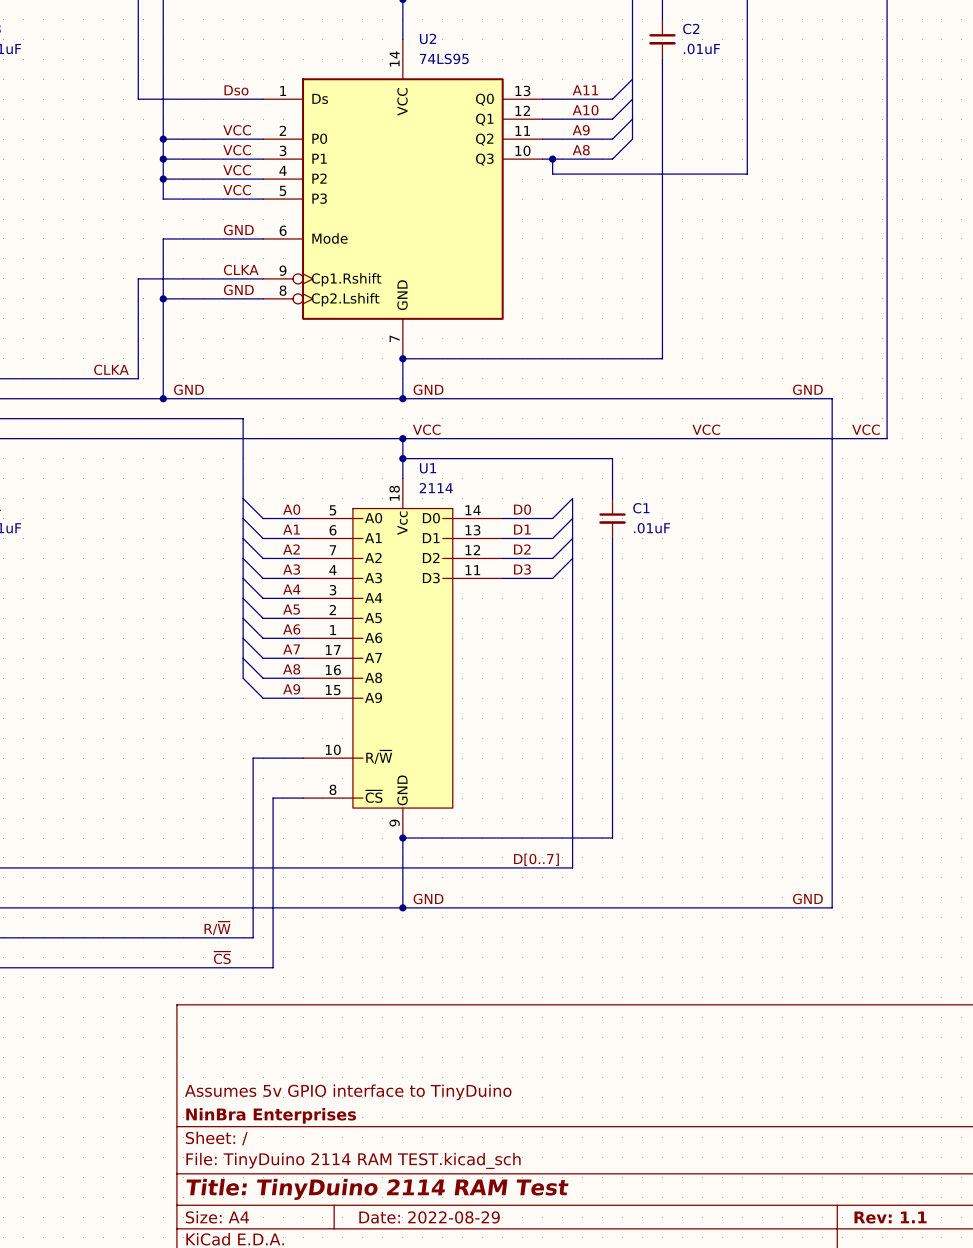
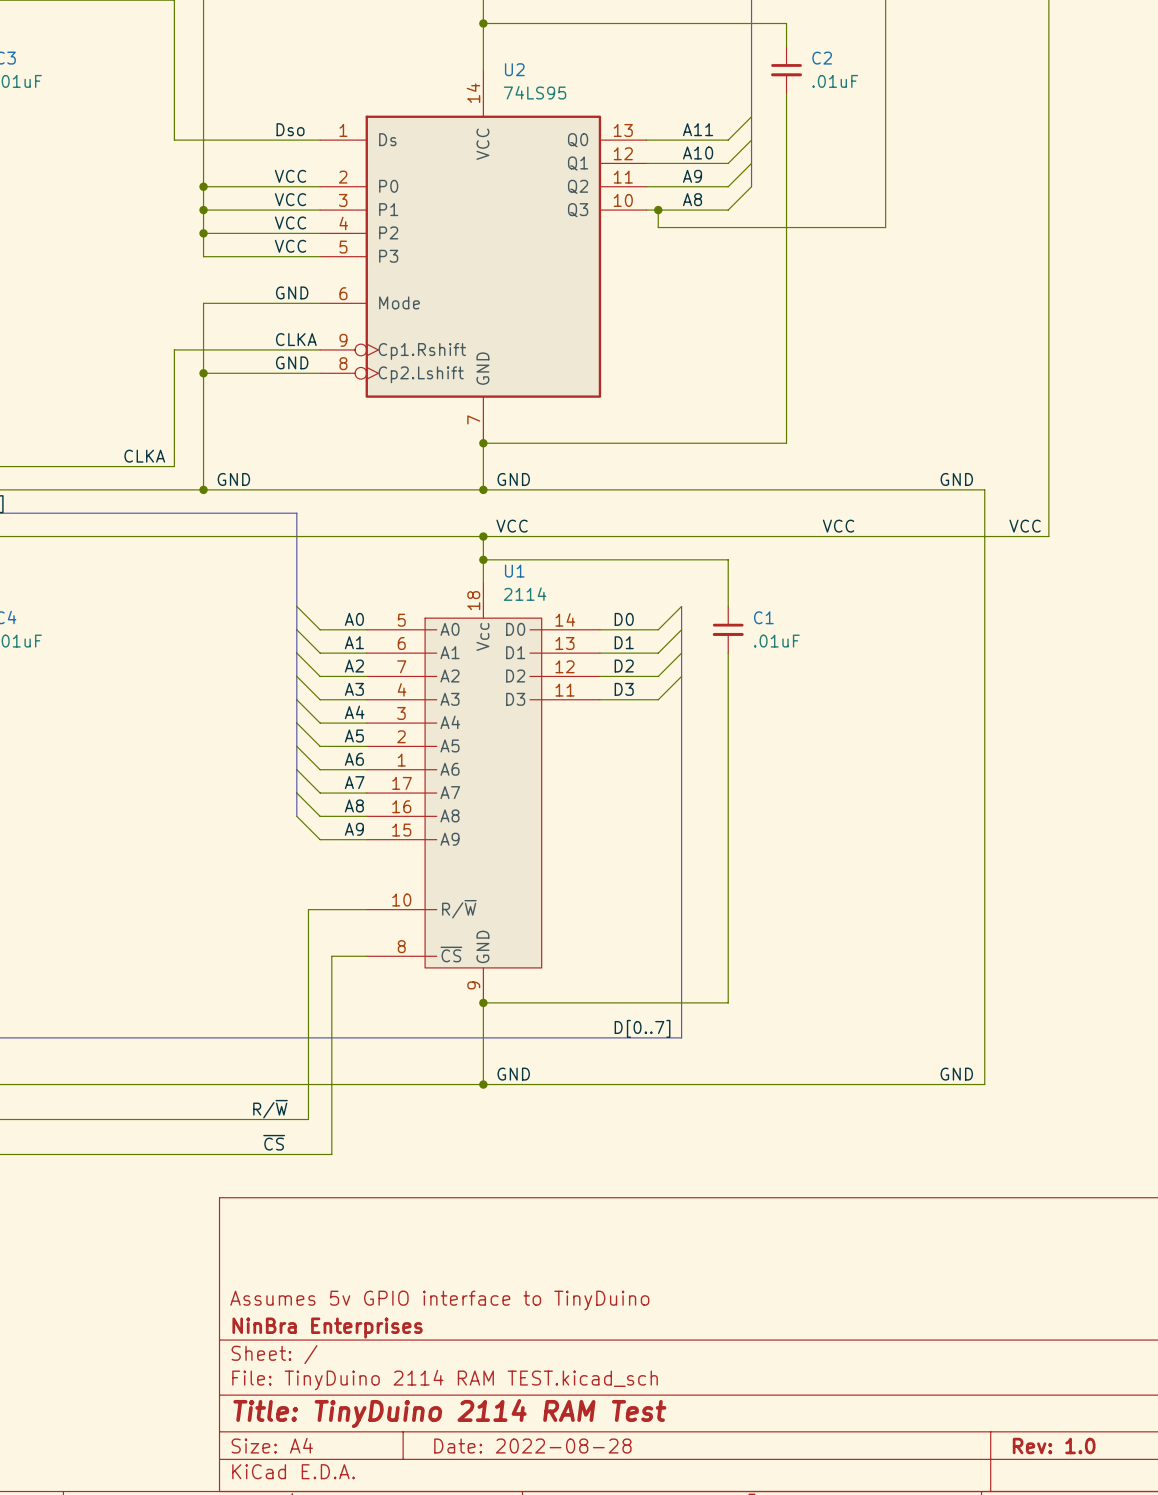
title block: Date: 2022-08-29 (429, 1217) -> Date: 2022-08-28 (532, 1446)
title block: Rev: 1.1 (890, 1217) -> Rev: 1.0 (1054, 1446)

